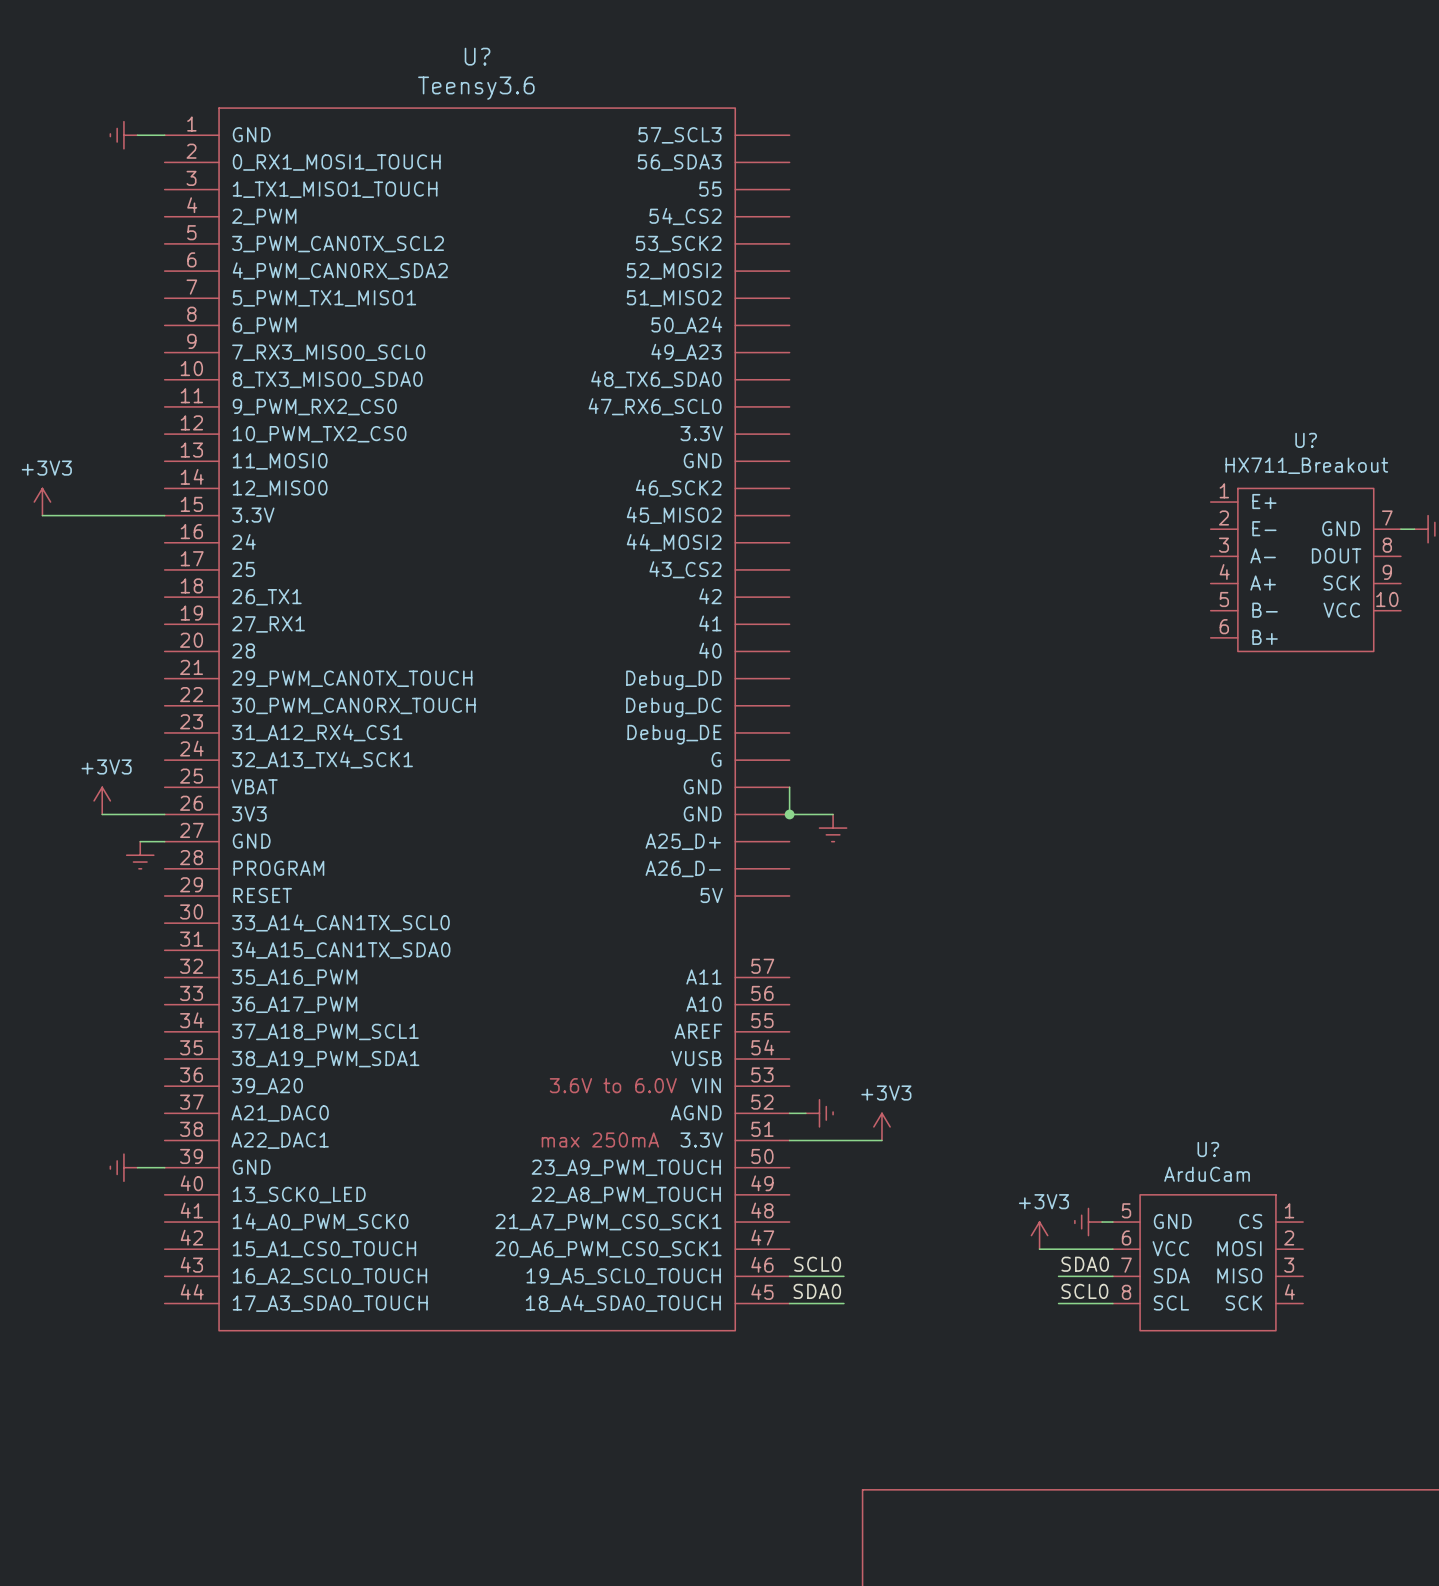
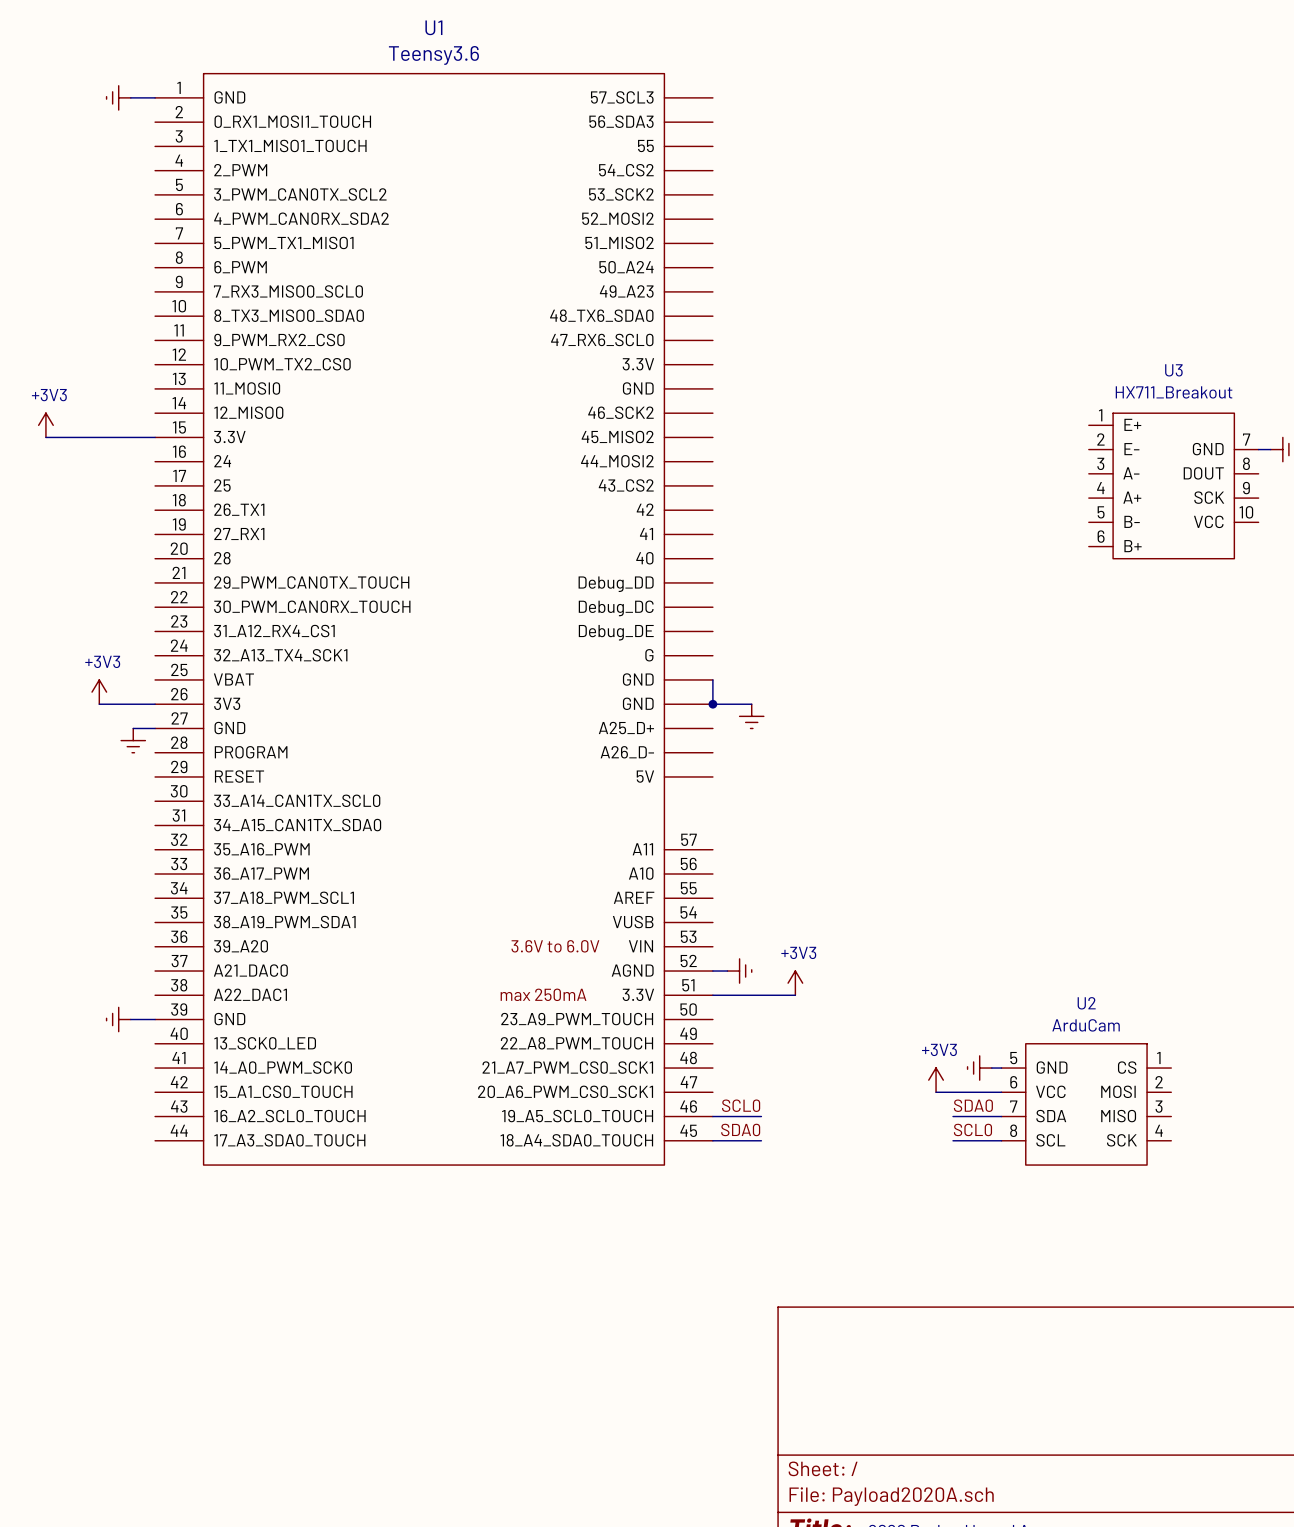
U? name: U? (477, 56) -> U1 (433, 27)
U? name: U? (1306, 440) -> U3 (1173, 370)
U? name: U? (1208, 1149) -> U2 (1086, 1003)

